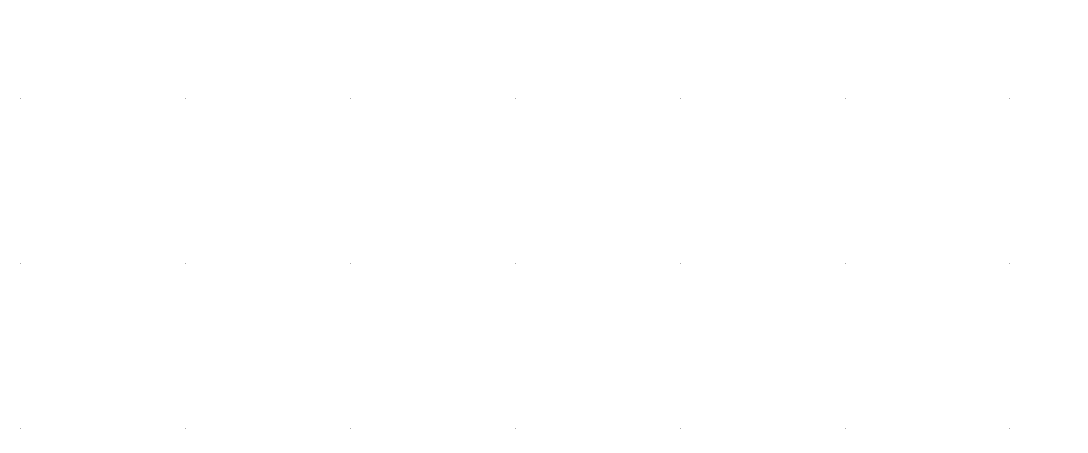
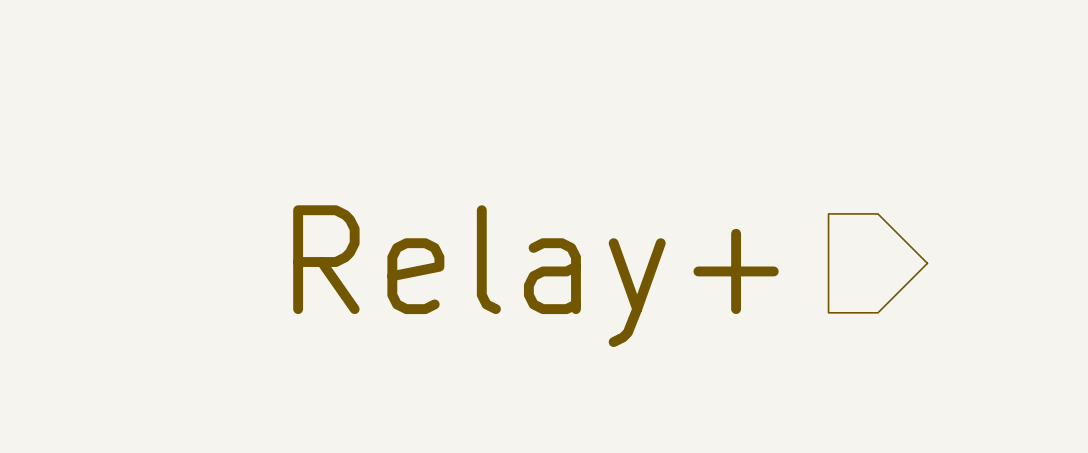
hierarchical label: none -> Relay+ (535, 276)

